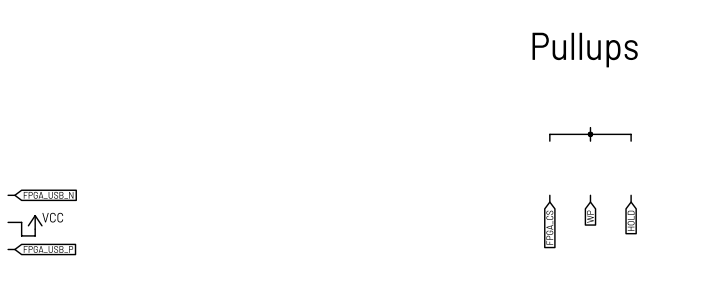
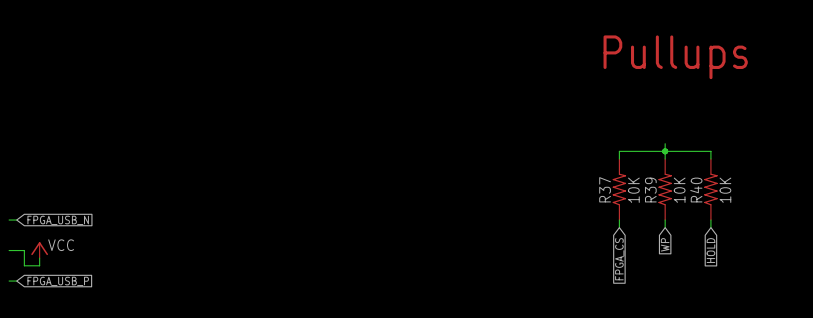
R37: none -> 10K (619, 189)
R39: none -> 10K (665, 189)
R40: none -> 10K (710, 189)

